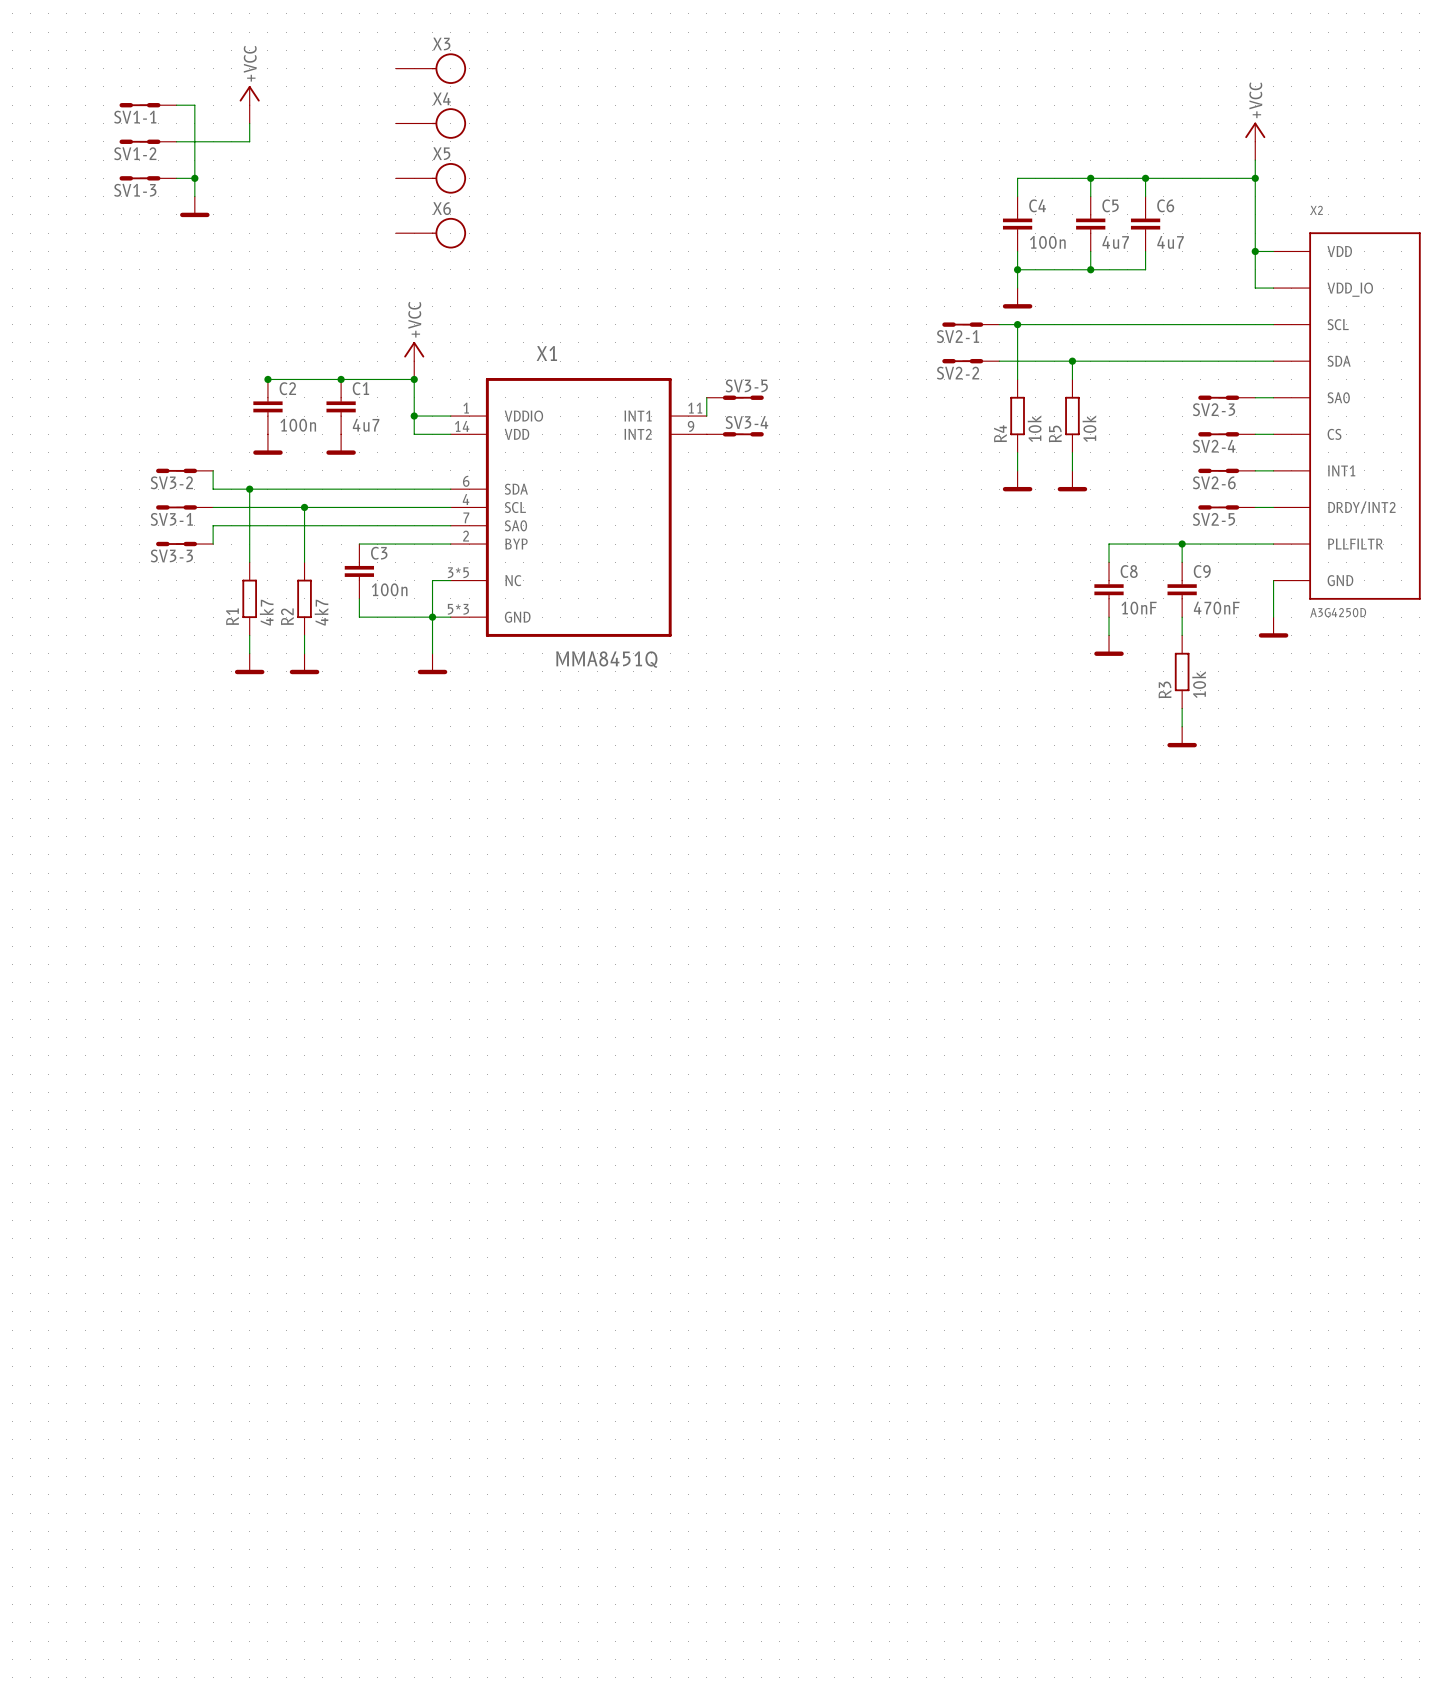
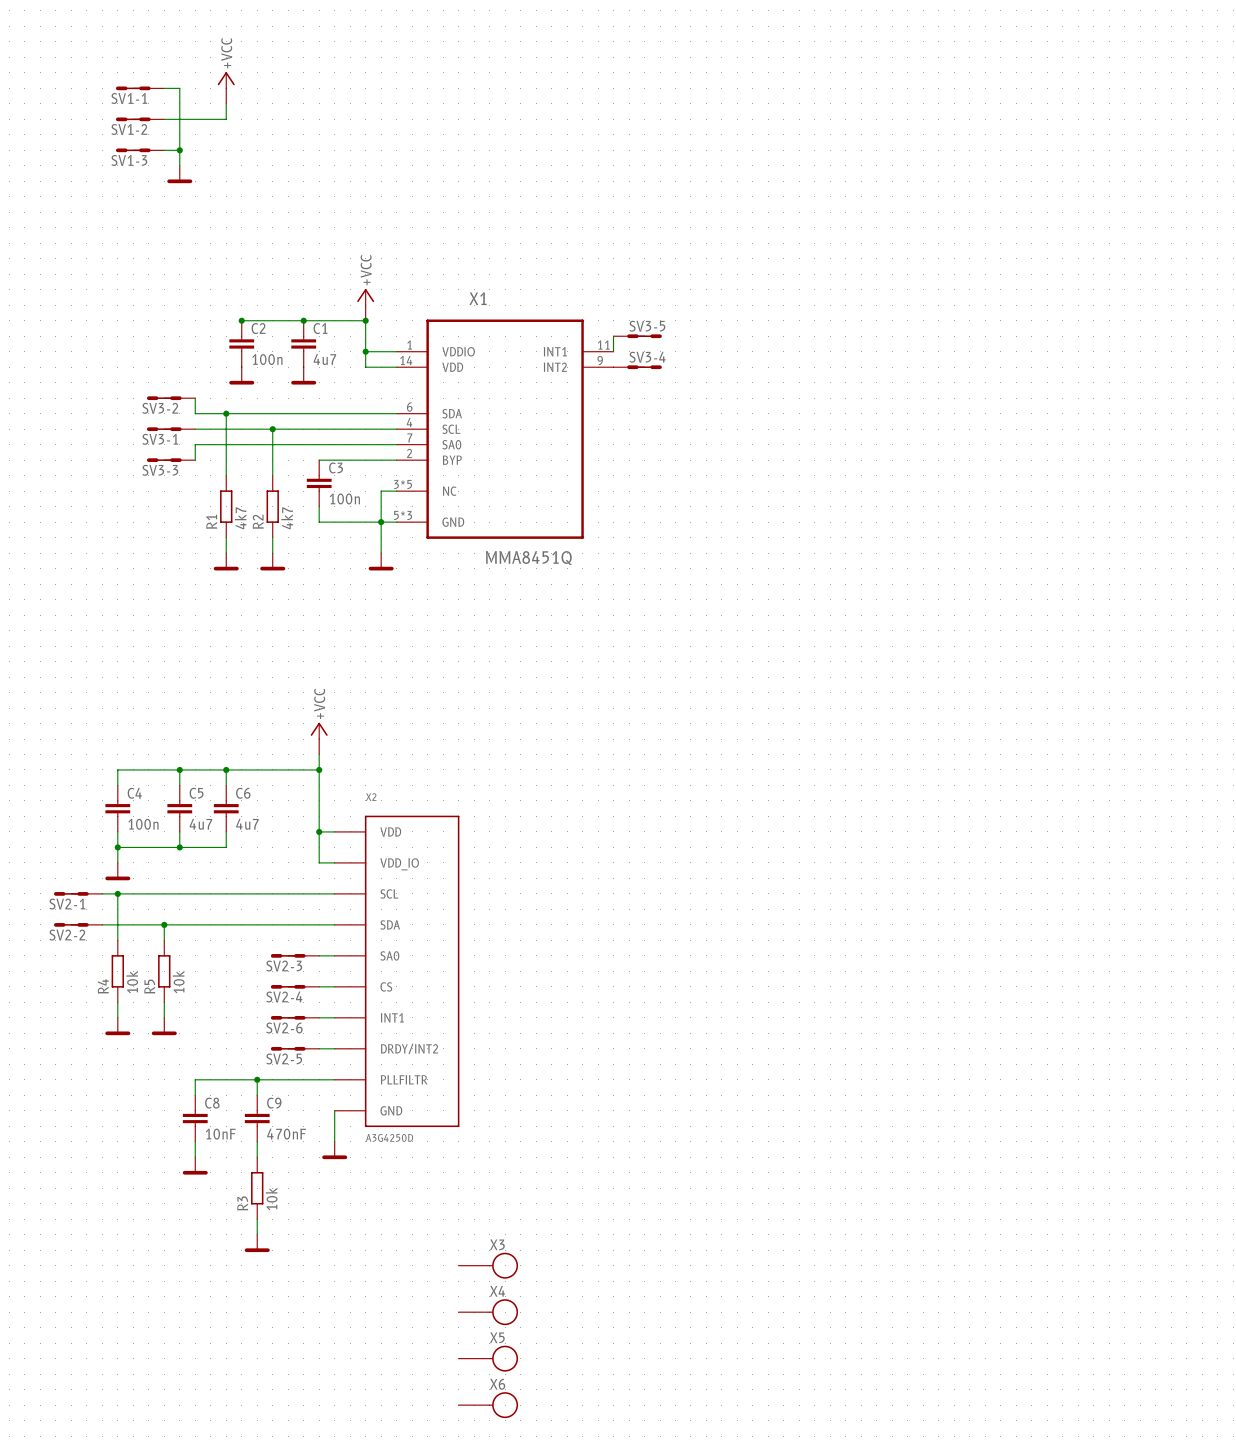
X3 position: (431, 68) -> (488, 1265)
X4 position: (431, 123) -> (488, 1312)
power symbol: +VCC (1255, 141) -> none
wire: (1255, 160) (1255, 288) (1273, 288) -> none
X5 position: (431, 178) -> (488, 1358)
wire: (1090, 178) (1090, 196) -> none
junction: (1090, 178) -> none
wire: (1145, 178) (1145, 196) -> none
junction: (1145, 178) -> none
wire: (1255, 178) (1017, 178) (1017, 196) -> none
junction: (1255, 178) -> none
C4 position: (1017, 224) -> (117, 808)
C5 position: (1090, 224) -> (179, 808)
C6 position: (1145, 224) -> (226, 808)
X6 position: (431, 233) -> (488, 1405)
wire: (1017, 251) (1017, 288) -> none
wire: (1090, 251) (1090, 269) -> none
wire: (1145, 251) (1145, 269) (1017, 269) -> none
wire: (1255, 251) (1273, 251) -> none
junction: (1255, 251) -> none
junction: (1017, 269) -> none
junction: (1090, 269) -> none
power symbol: (1017, 298) -> none
SV2-1 position: (970, 324) -> (78, 893)
wire: (999, 324) (1273, 324) -> none
wire: (1017, 324) (1017, 379) -> none
junction: (1017, 324) -> none
SV2-2 position: (970, 361) -> (78, 924)
wire: (999, 361) (1273, 361) -> none
wire: (1072, 361) (1072, 379) -> none
junction: (1072, 361) -> none
SV2-3 position: (1226, 397) -> (295, 955)
wire: (1255, 397) (1273, 397) -> none
R4 position: (1017, 416) -> (117, 971)
R5 position: (1072, 416) -> (164, 971)
X2 position: (1347, 416) -> (397, 971)
SV2-4 position: (1226, 434) -> (295, 986)
wire: (1255, 434) (1273, 434) -> none
wire: (1017, 452) (1017, 470) -> none
wire: (1072, 452) (1072, 470) -> none
SV2-6 position: (1226, 470) -> (295, 1017)
wire: (1255, 470) (1273, 470) -> none
power symbol: (1017, 481) -> none
power symbol: (1072, 481) -> none
SV2-5 position: (1226, 507) -> (295, 1048)
wire: (1255, 507) (1273, 507) -> none
wire: (1182, 544) (1182, 562) -> none
junction: (1182, 544) -> none
wire: (1273, 544) (1109, 544) (1109, 562) -> none
wire: (1273, 580) (1273, 617) -> none
C8 position: (1109, 589) -> (195, 1118)
C9 position: (1182, 589) -> (257, 1118)
wire: (1109, 617) (1109, 635) -> none
wire: (1182, 617) (1182, 635) -> none
power symbol: (1273, 627) -> none
power symbol: (1109, 645) -> none
R3 position: (1182, 671) -> (257, 1188)
wire: (1182, 708) (1182, 726) -> none
power symbol: (1182, 737) -> none
power symbol: none -> +VCC (319, 738)
wire: none -> (319, 754) (319, 862) (334, 862)
wire: none -> (179, 769) (179, 785)
junction: none -> (179, 769)
wire: none -> (226, 769) (226, 785)
junction: none -> (226, 769)
wire: none -> (319, 769) (117, 769) (117, 785)
junction: none -> (319, 769)
wire: none -> (117, 831) (117, 862)
wire: none -> (179, 831) (179, 847)
wire: none -> (226, 831) (226, 847) (117, 847)
wire: none -> (319, 831) (334, 831)
junction: none -> (319, 831)
junction: none -> (117, 847)
junction: none -> (179, 847)
power symbol: none -> (117, 871)
wire: none -> (102, 893) (334, 893)
wire: none -> (117, 893) (117, 940)
junction: none -> (117, 893)
wire: none -> (102, 924) (334, 924)
wire: none -> (164, 924) (164, 940)
junction: none -> (164, 924)
wire: none -> (319, 955) (334, 955)
wire: none -> (319, 986) (334, 986)
wire: none -> (117, 1002) (117, 1017)
wire: none -> (164, 1002) (164, 1017)
wire: none -> (319, 1017) (334, 1017)
power symbol: none -> (117, 1026)
power symbol: none -> (164, 1026)
wire: none -> (319, 1048) (334, 1048)
wire: none -> (257, 1079) (257, 1095)
junction: none -> (257, 1079)
wire: none -> (334, 1079) (195, 1079) (195, 1095)
wire: none -> (334, 1110) (334, 1141)
wire: none -> (195, 1141) (195, 1157)
wire: none -> (257, 1141) (257, 1157)
power symbol: none -> (334, 1150)
power symbol: none -> (195, 1165)
wire: none -> (257, 1219) (257, 1234)
power symbol: none -> (257, 1243)

